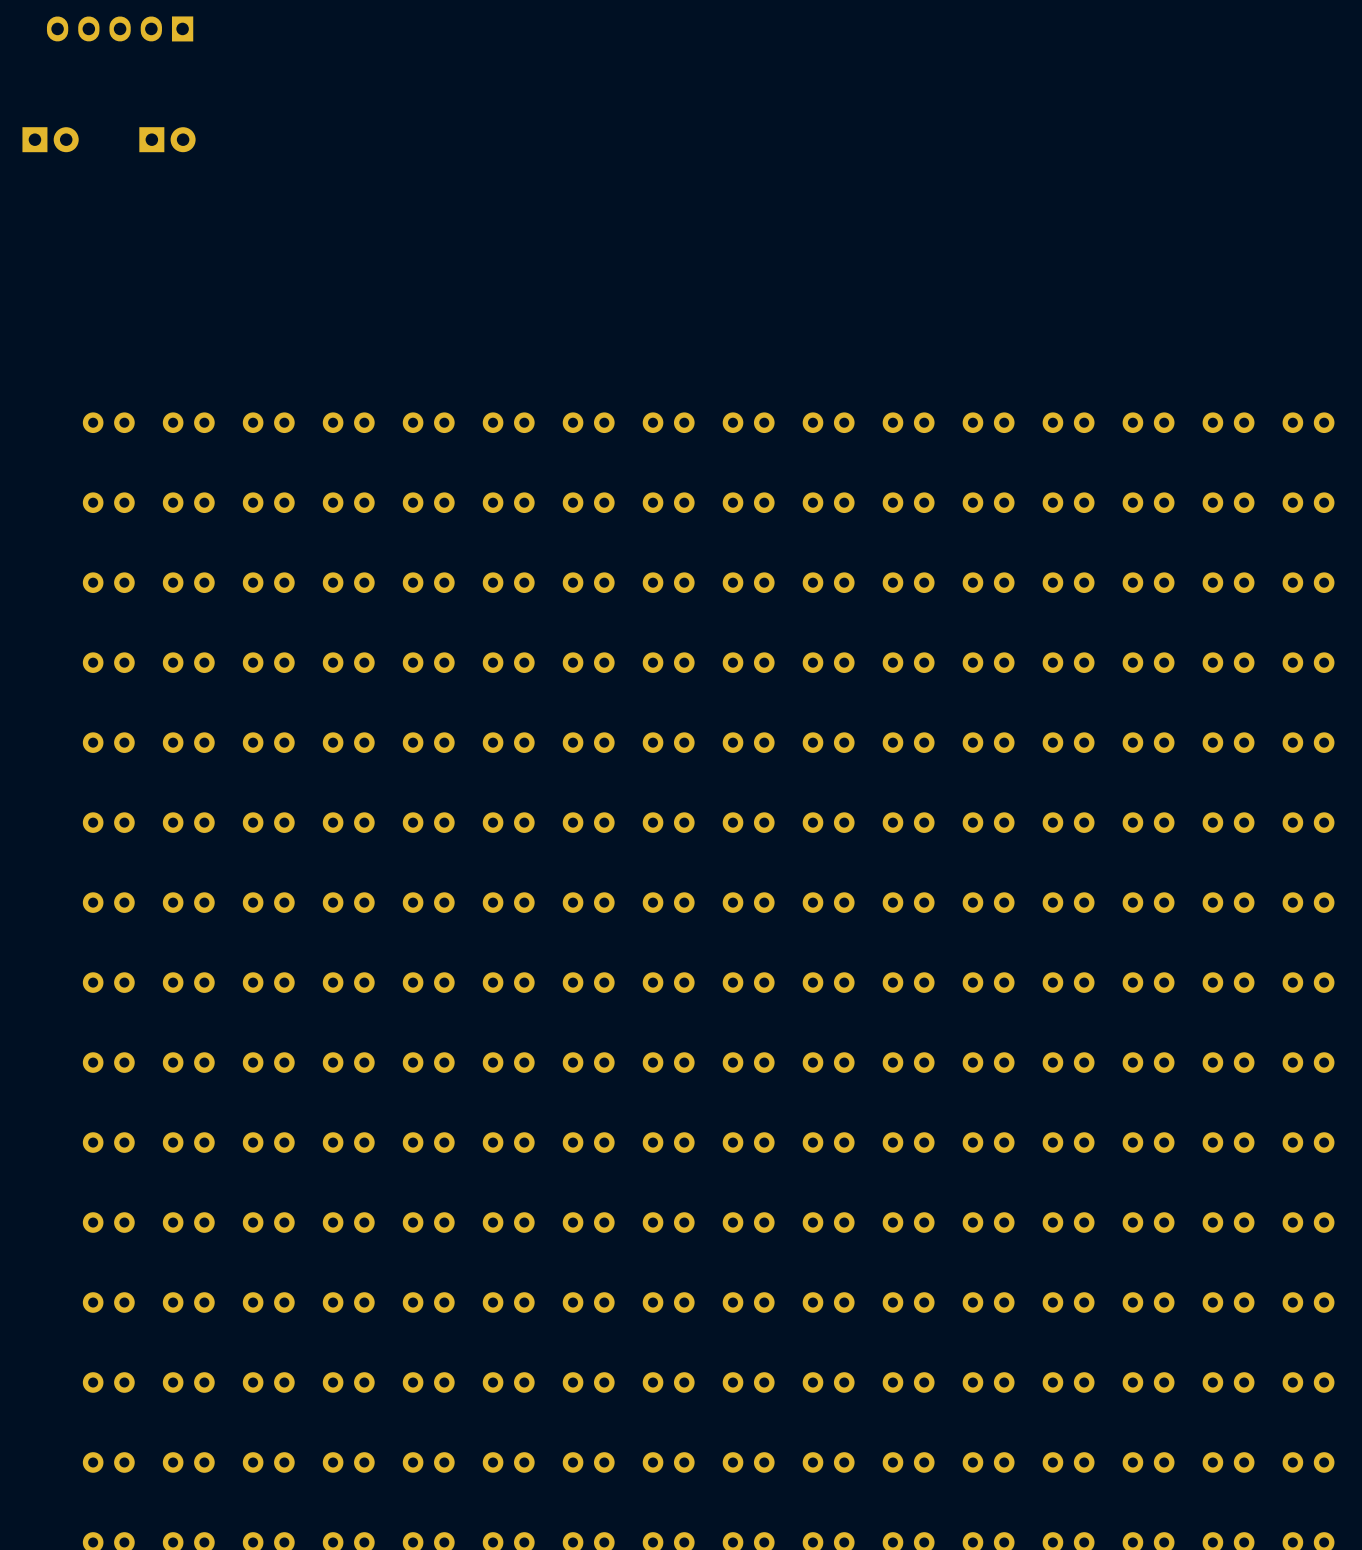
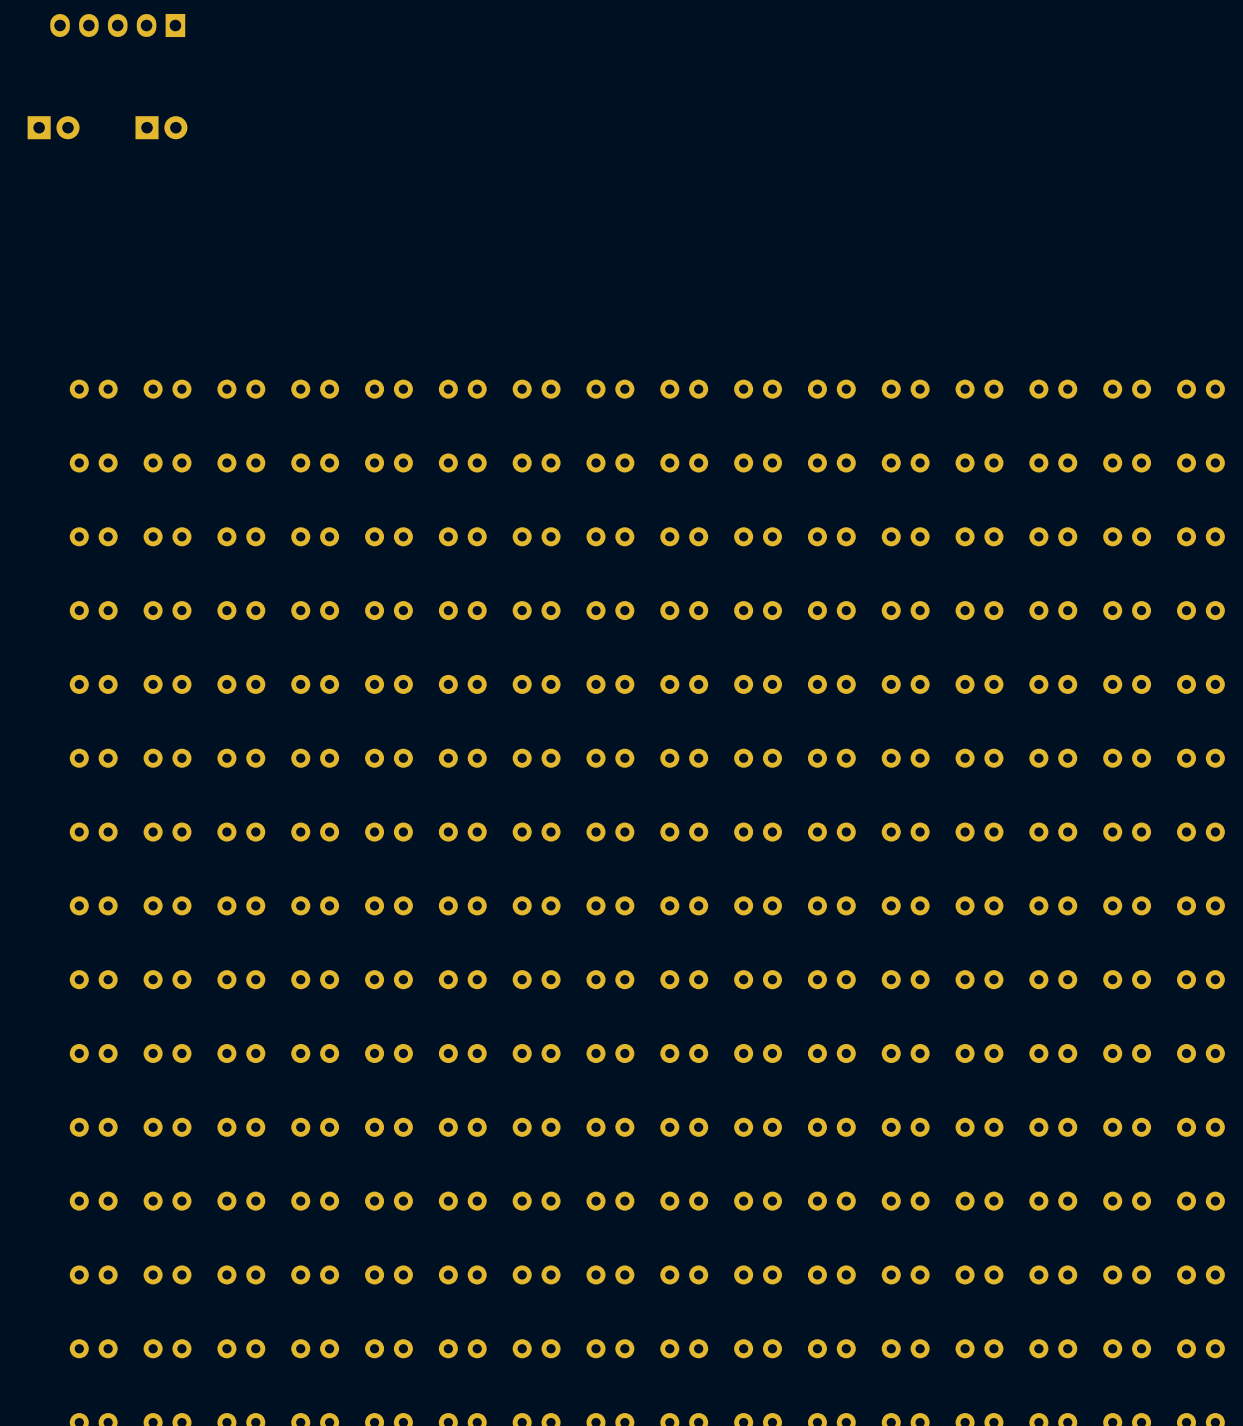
part position: (120, 28) -> (117, 25)
part position: (50, 139) -> (53, 127)
part position: (167, 139) -> (161, 127)

